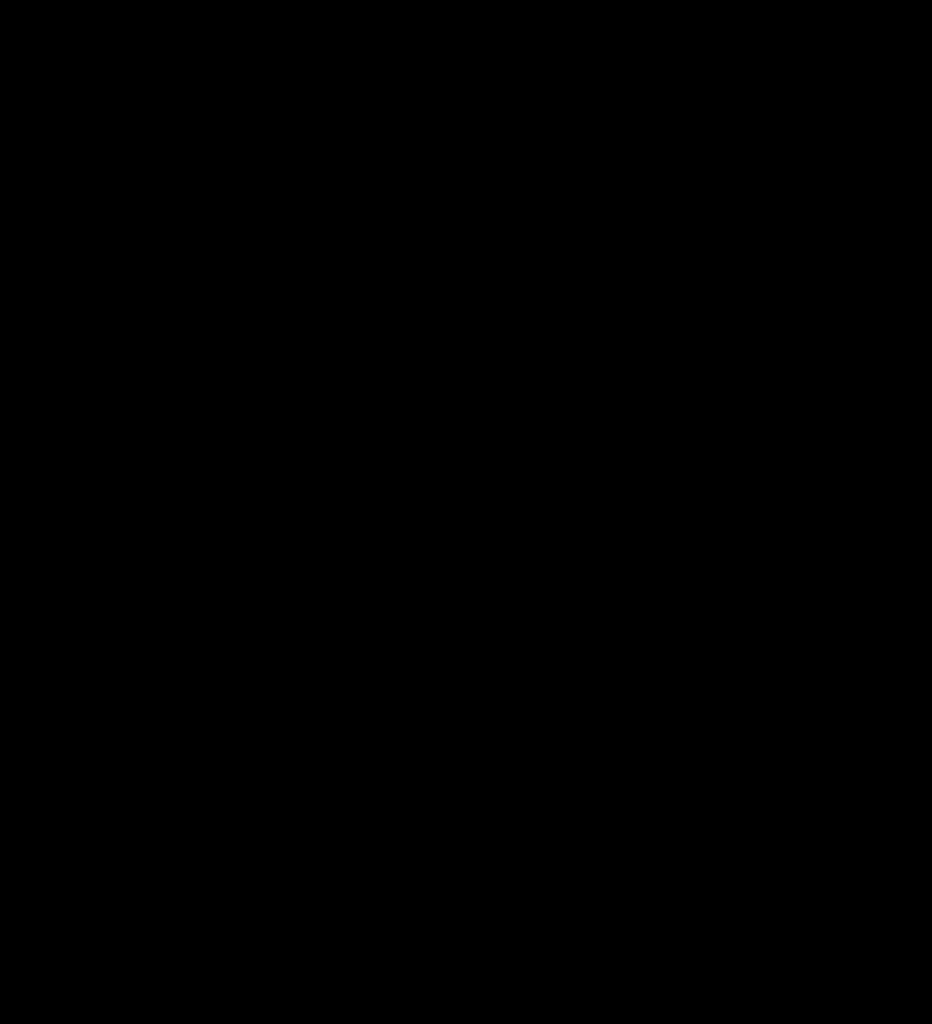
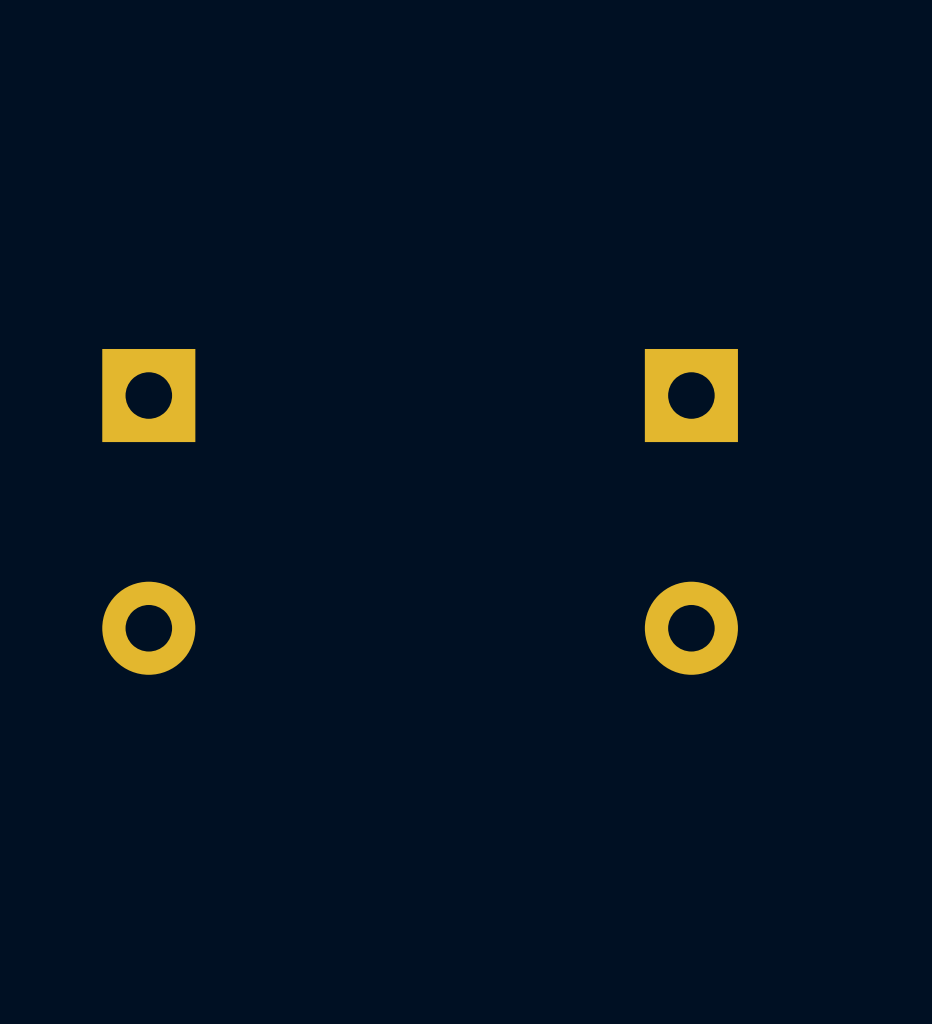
part: none -> (148, 511)
part: none -> (691, 511)

